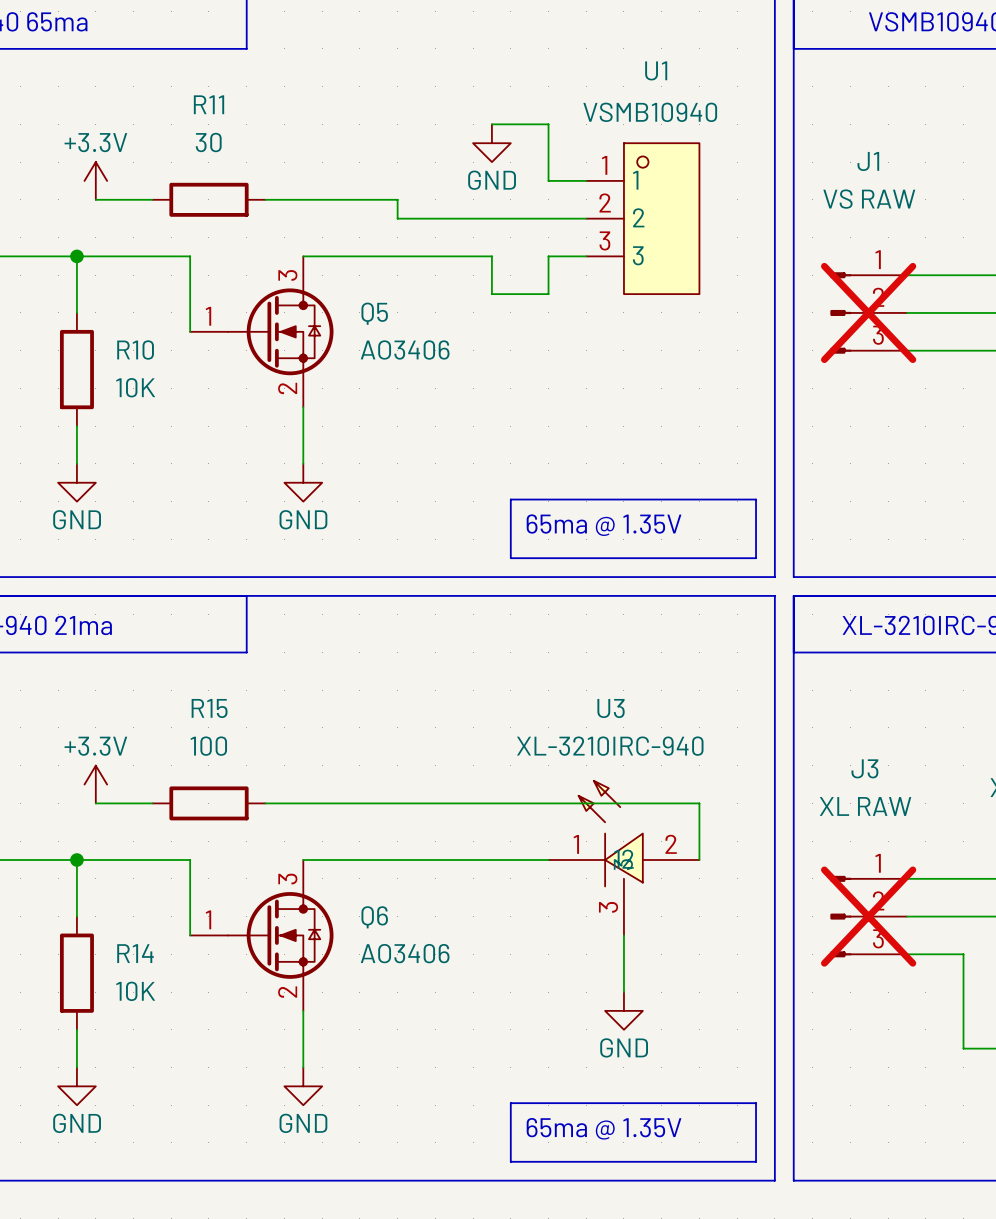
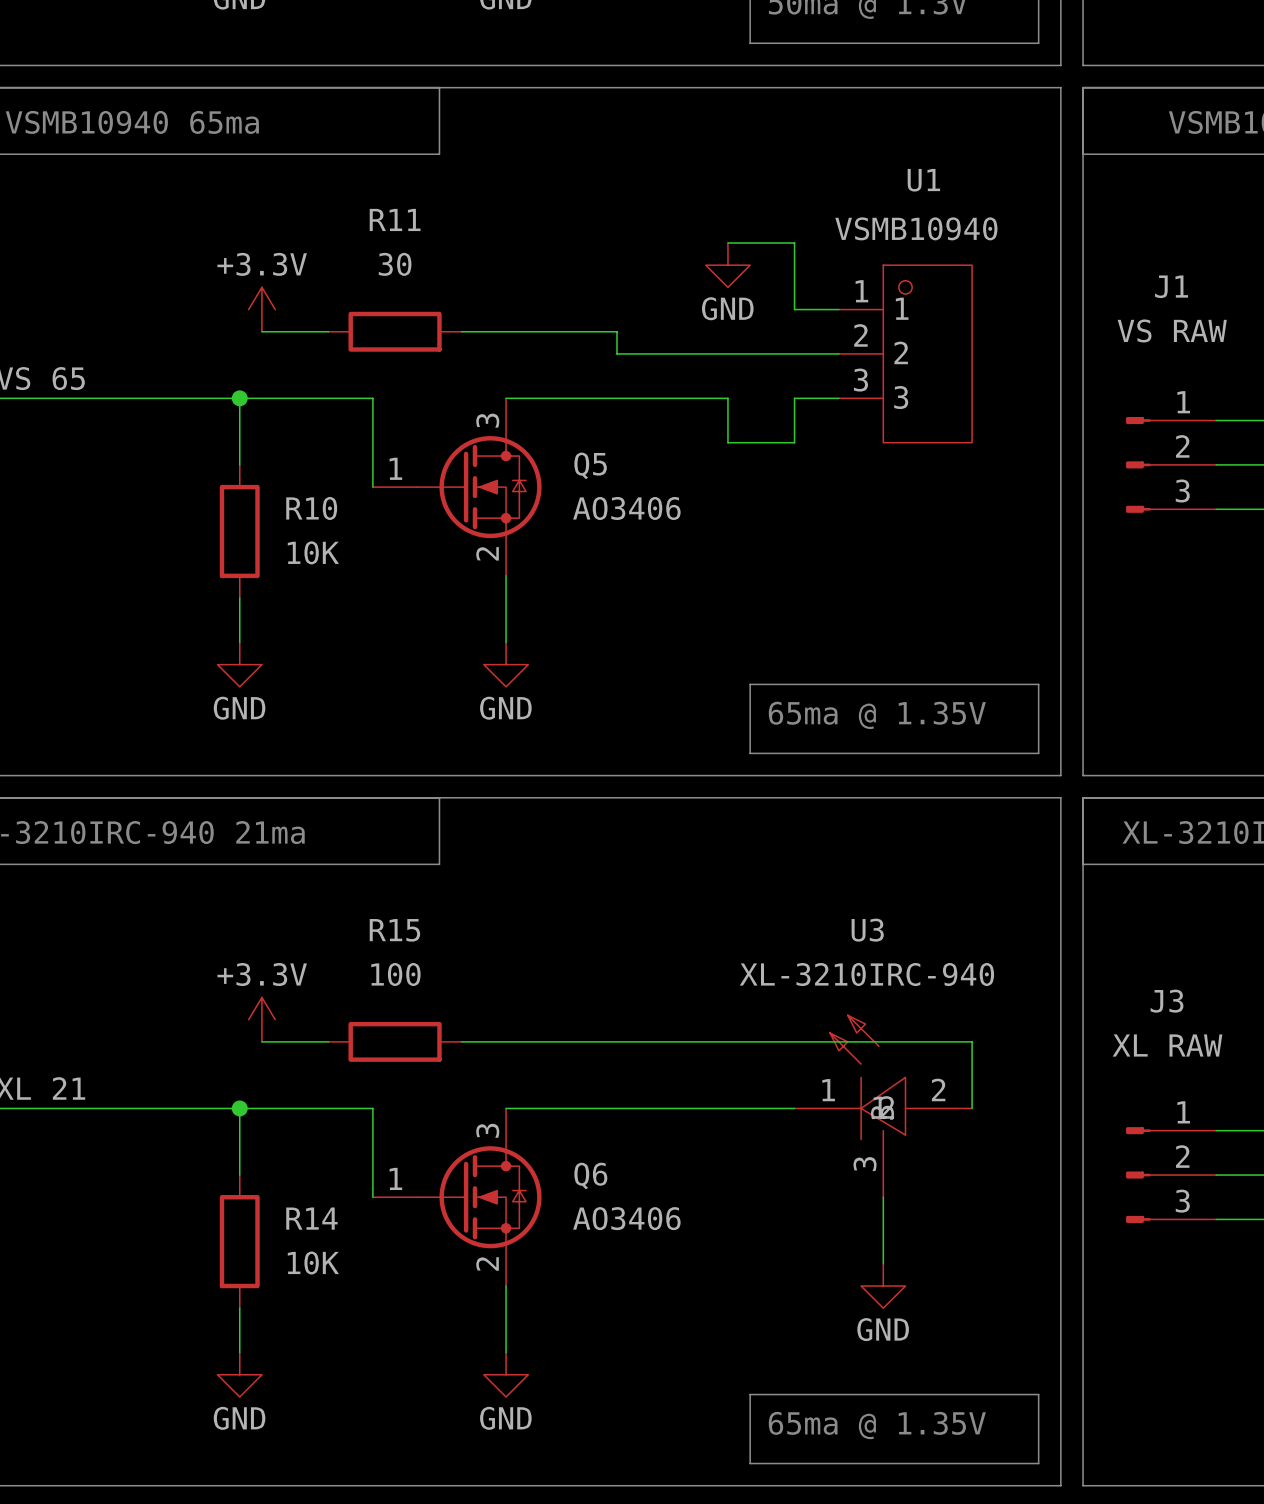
J1 do-not-place cross: (868, 312) -> none
J3 do-not-place cross: (868, 916) -> none

